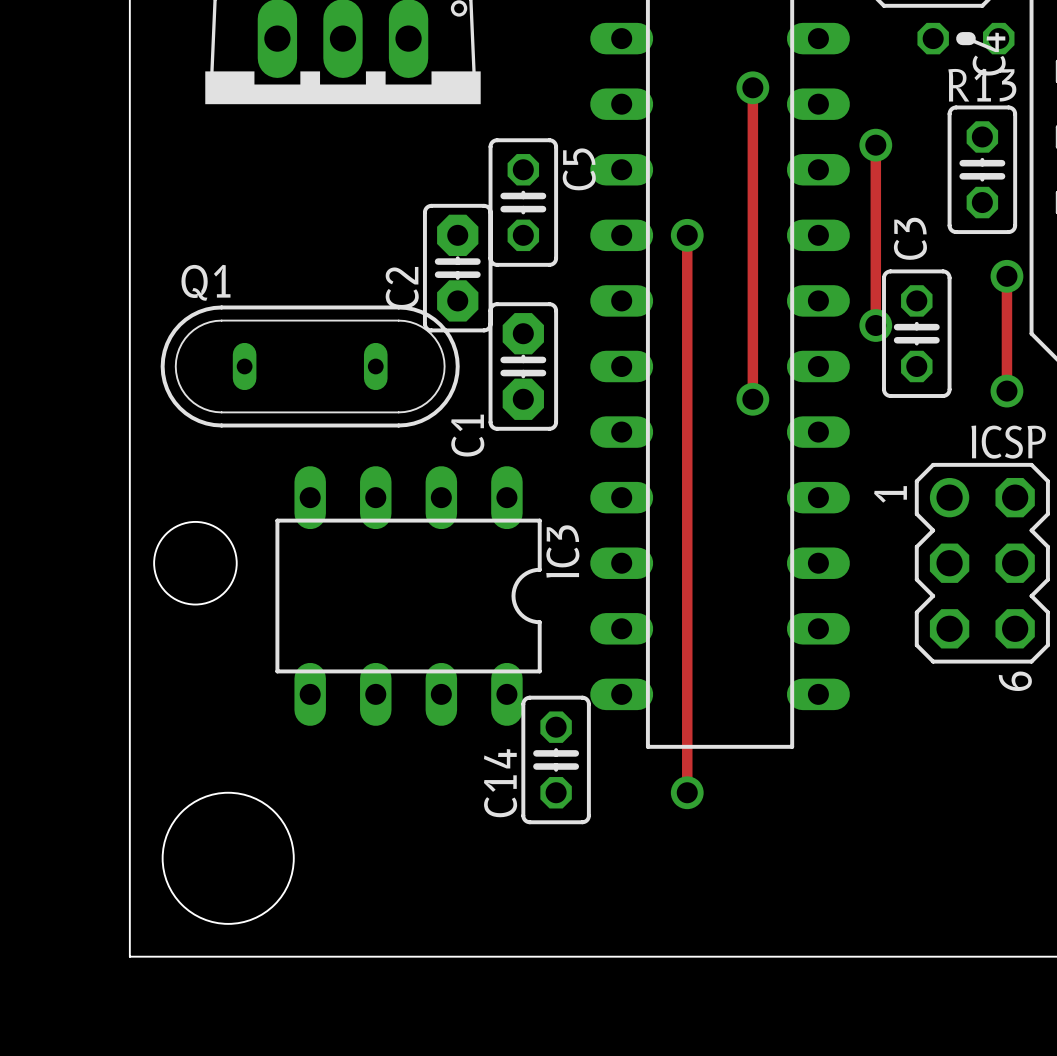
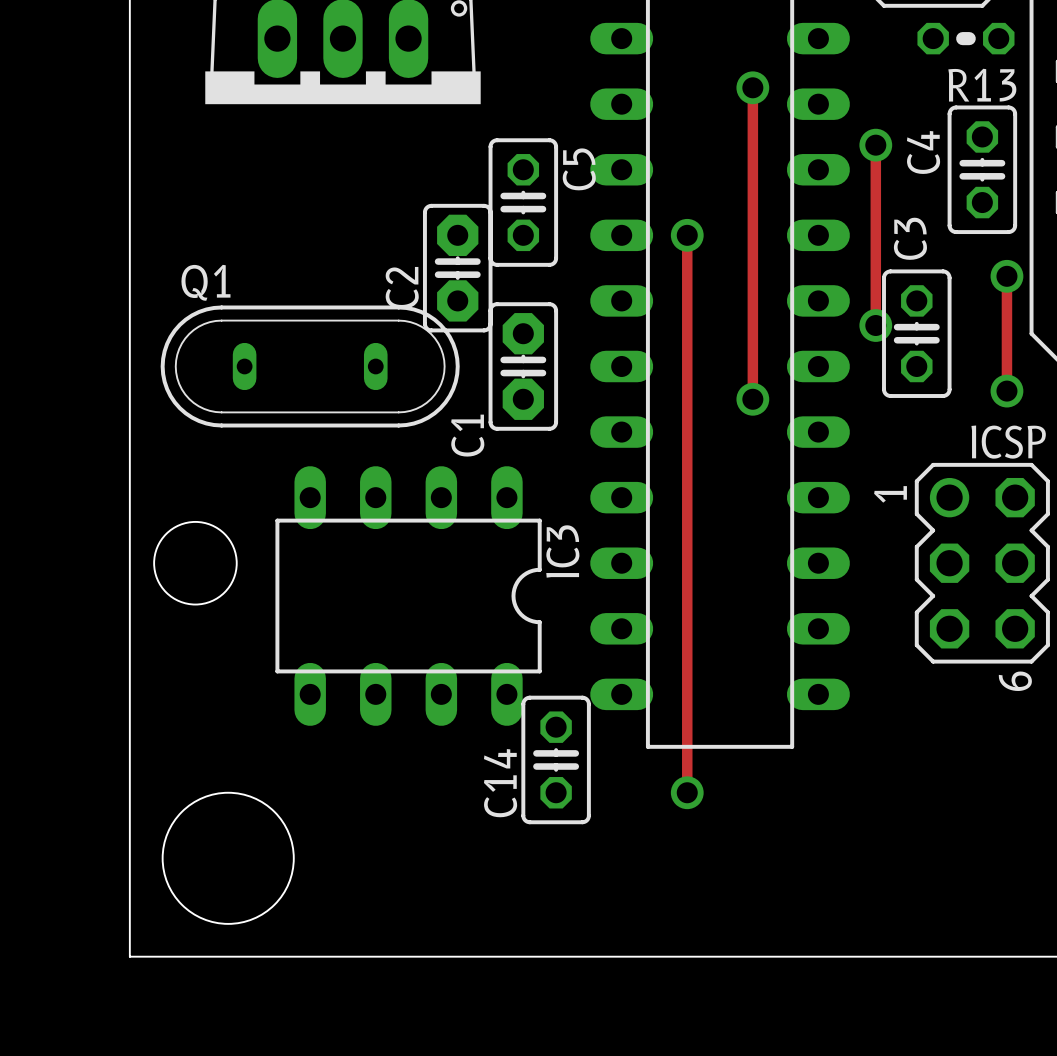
C4 name position: C4 (989, 54) -> C4 (923, 152)

